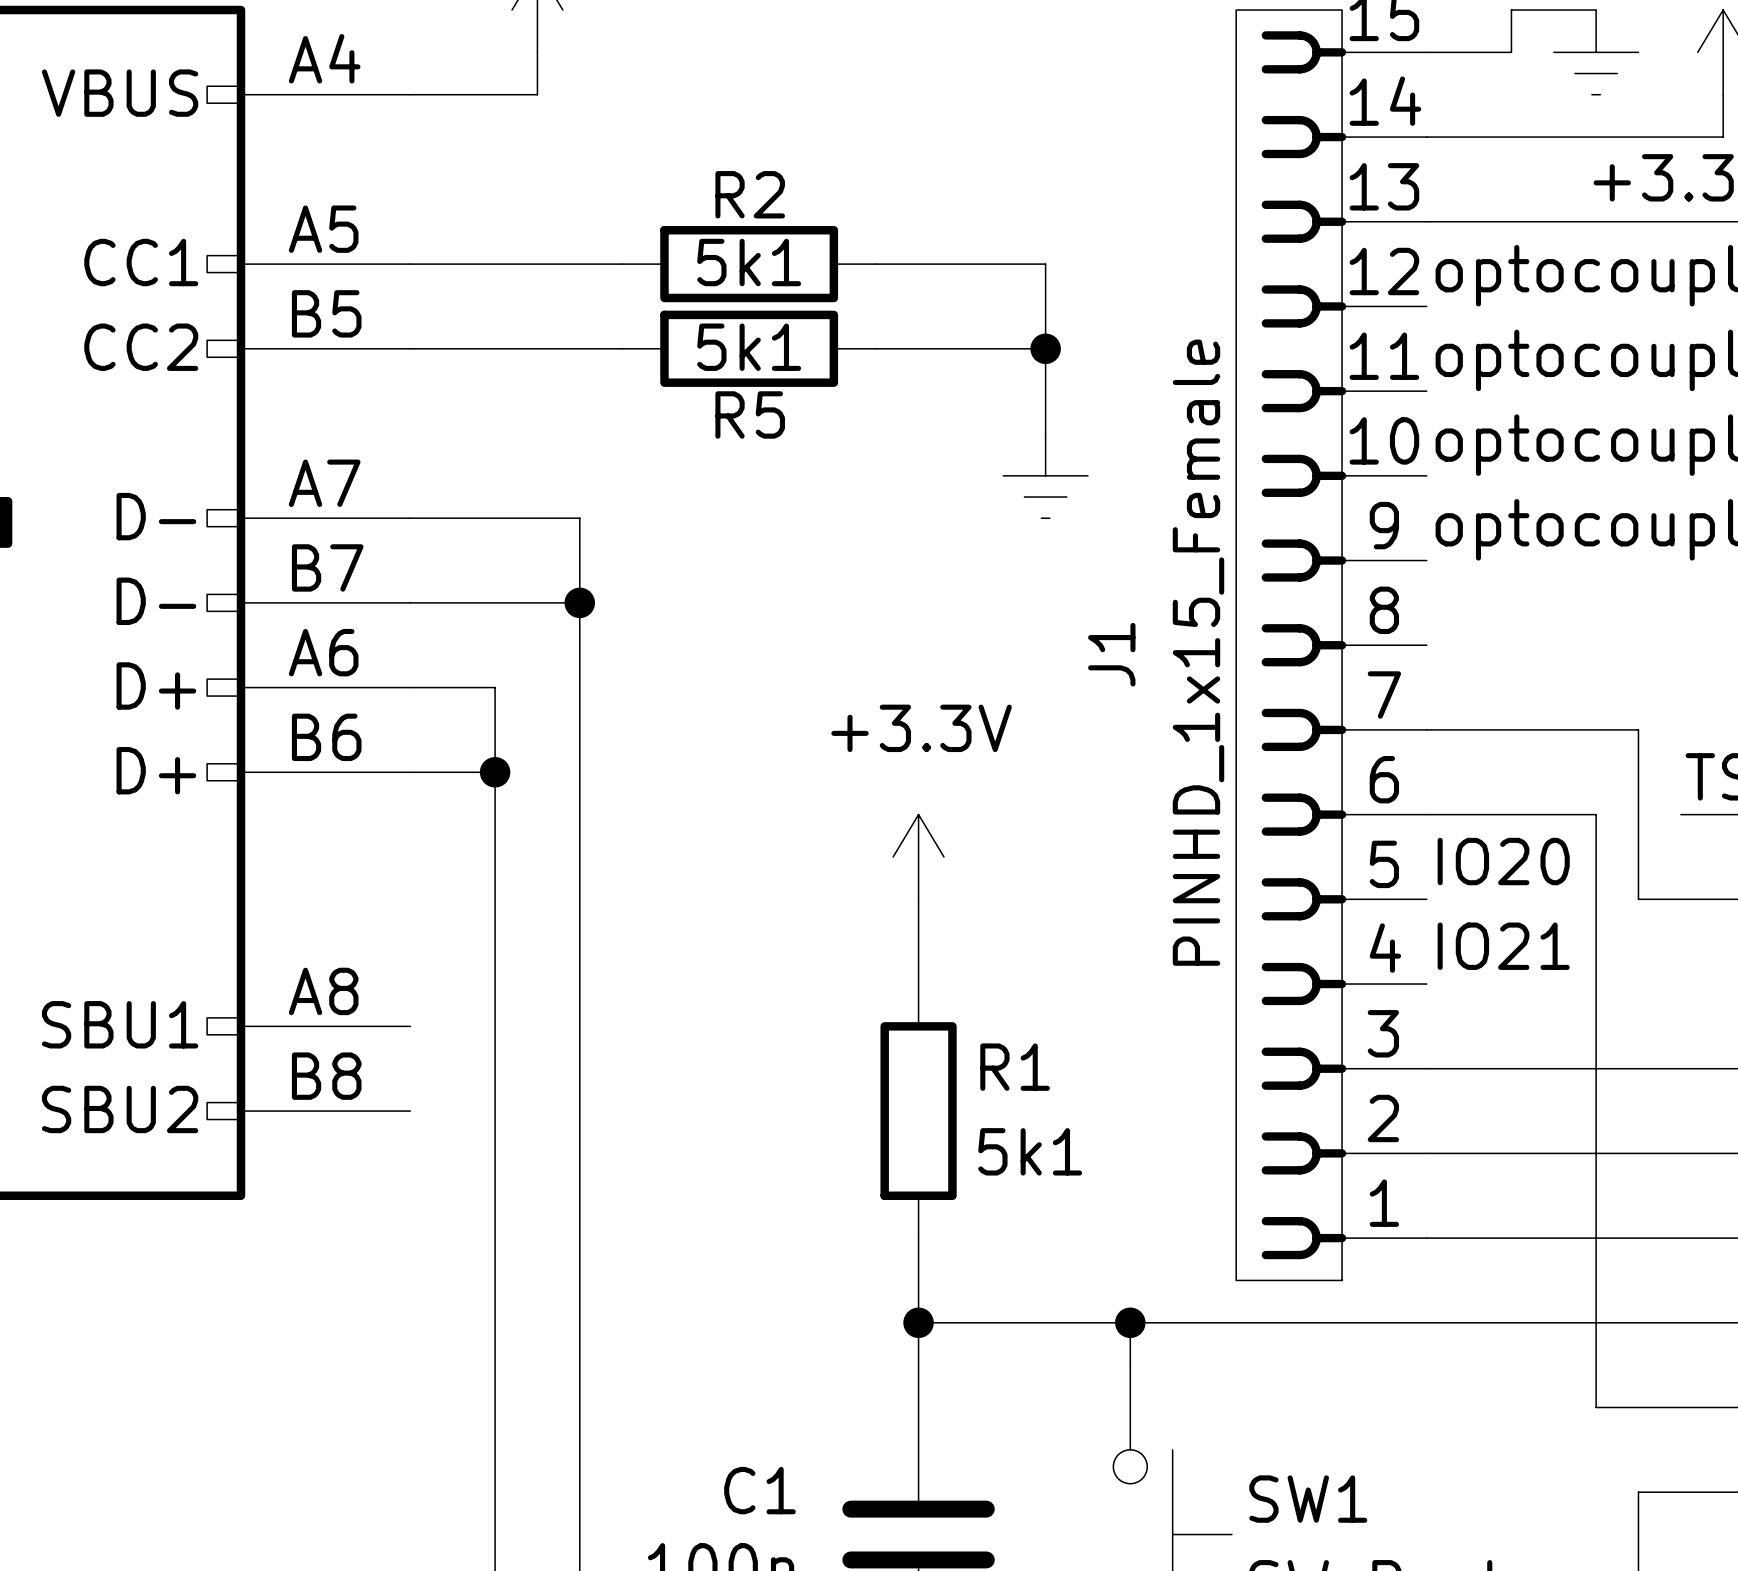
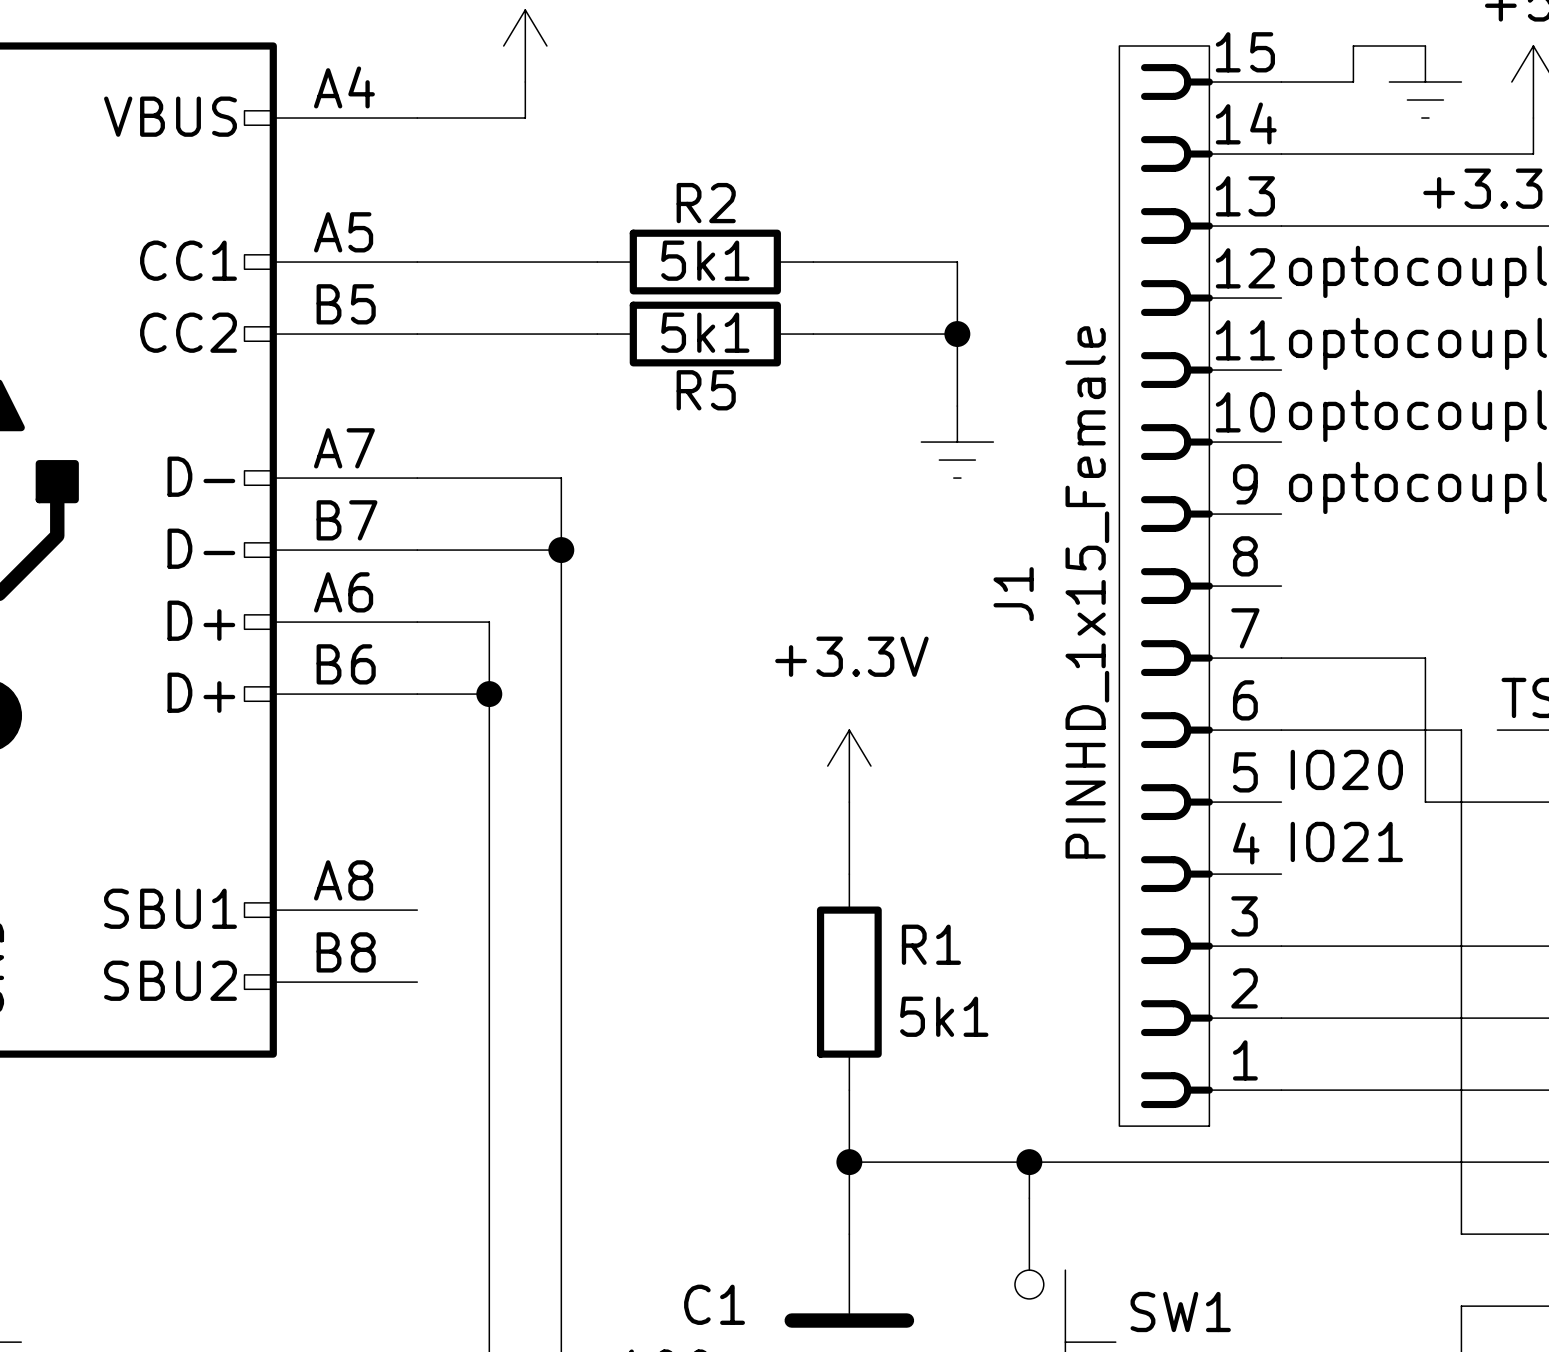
wire: (1596, 729) (1638, 729) (1638, 814) -> (1425, 658) (1425, 730) (1461, 730)
wire: (1596, 899) (1596, 1407) (1638, 1407) -> (1425, 802) (1461, 802) (1461, 1234)

